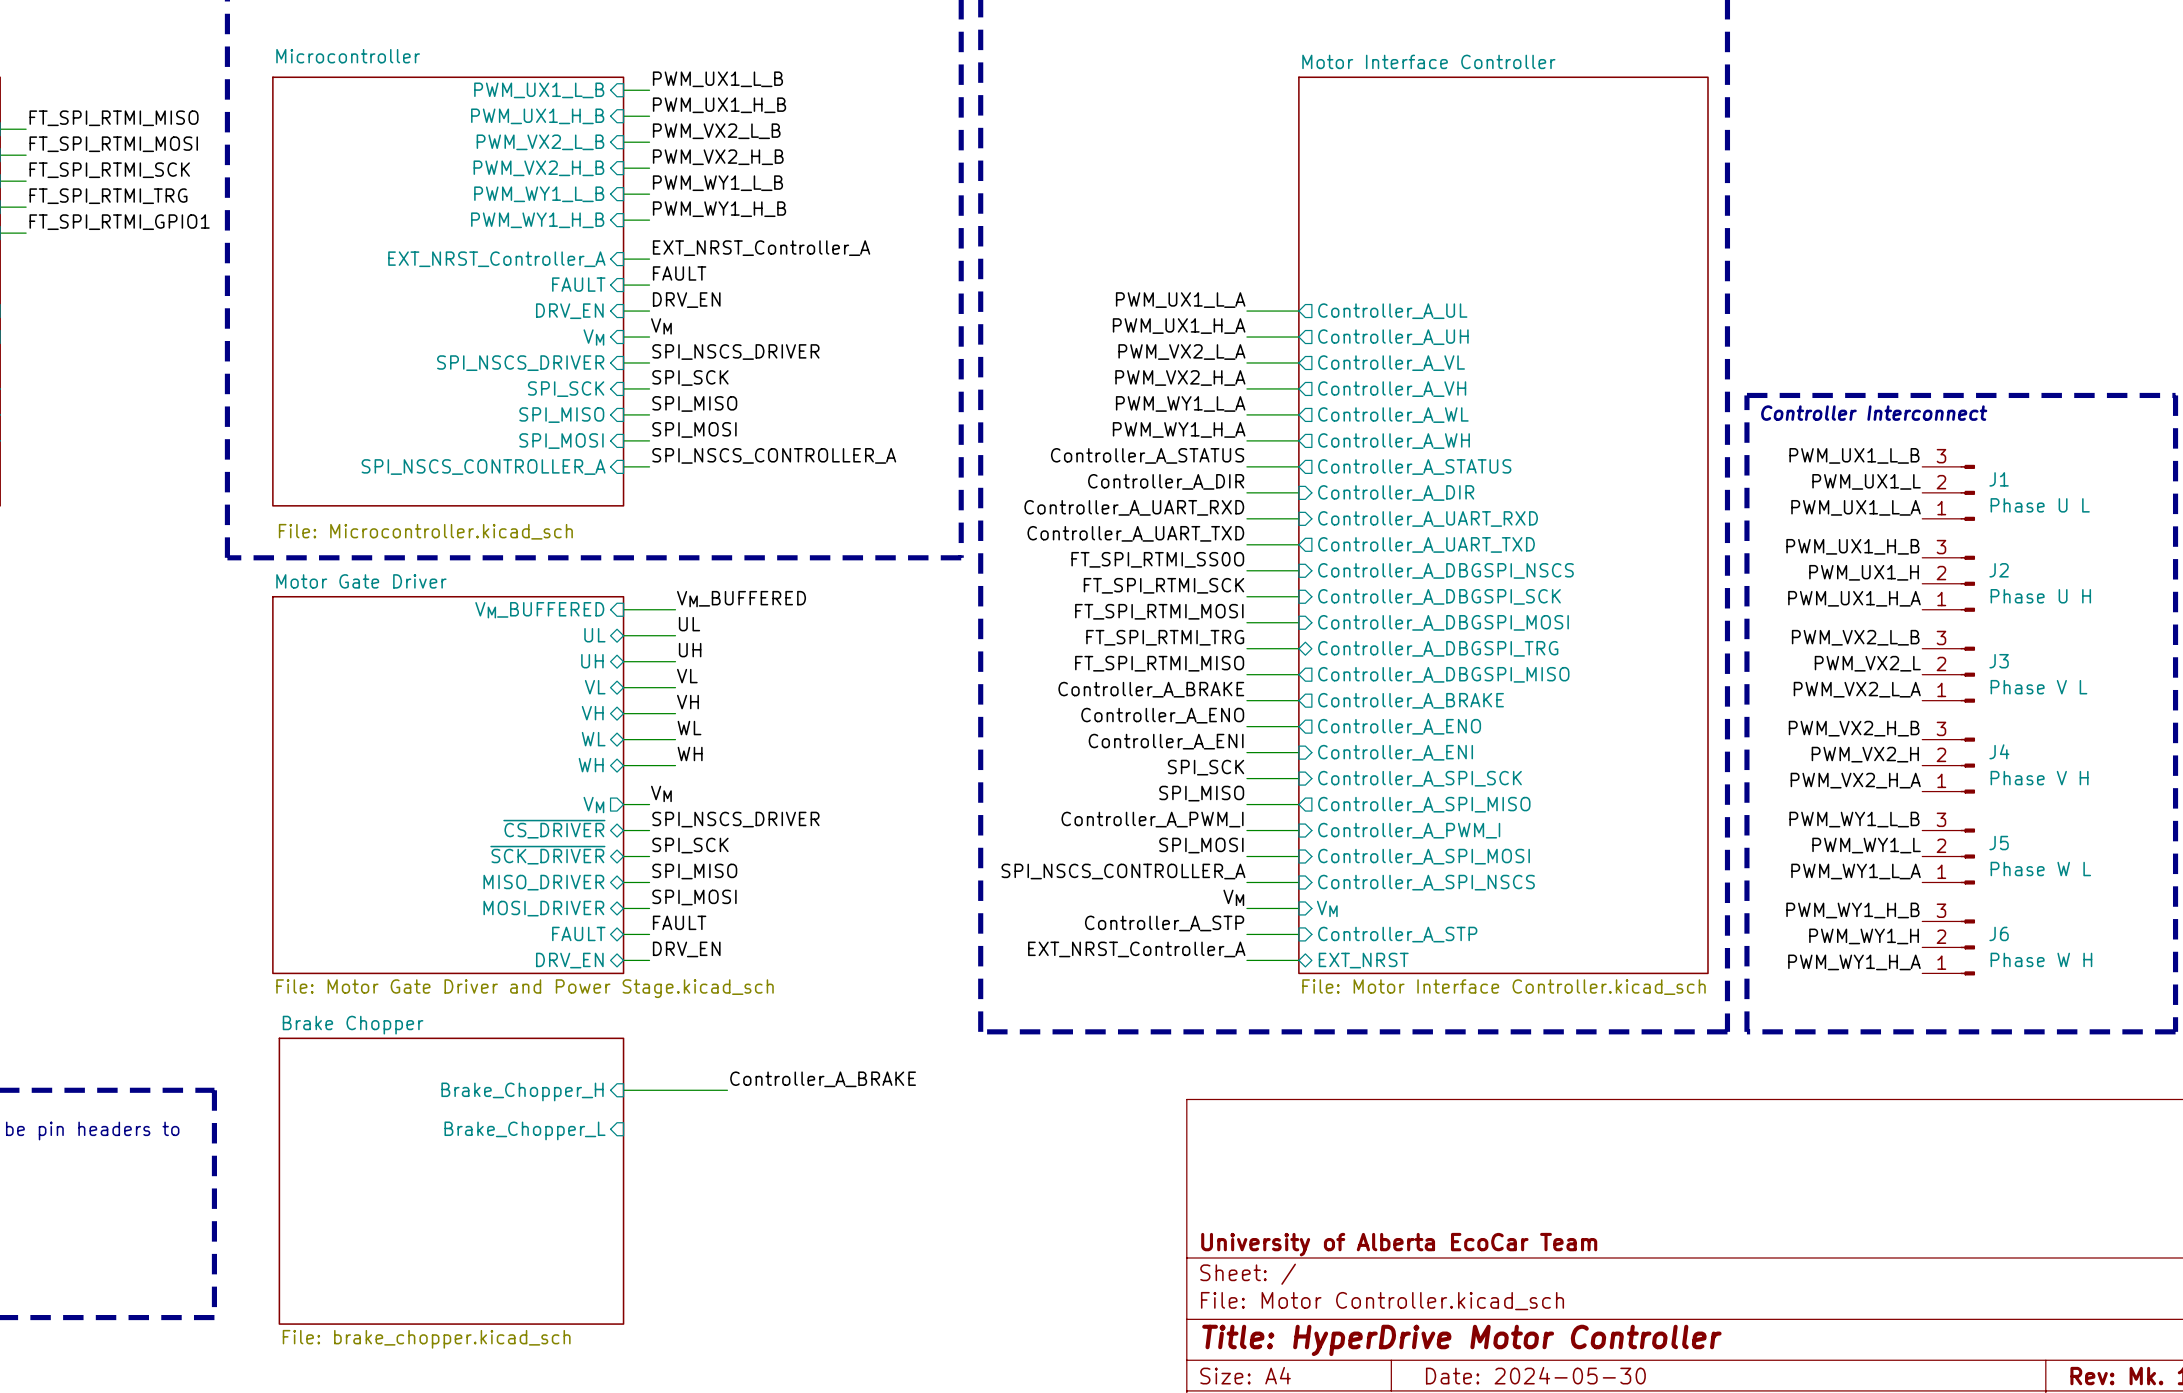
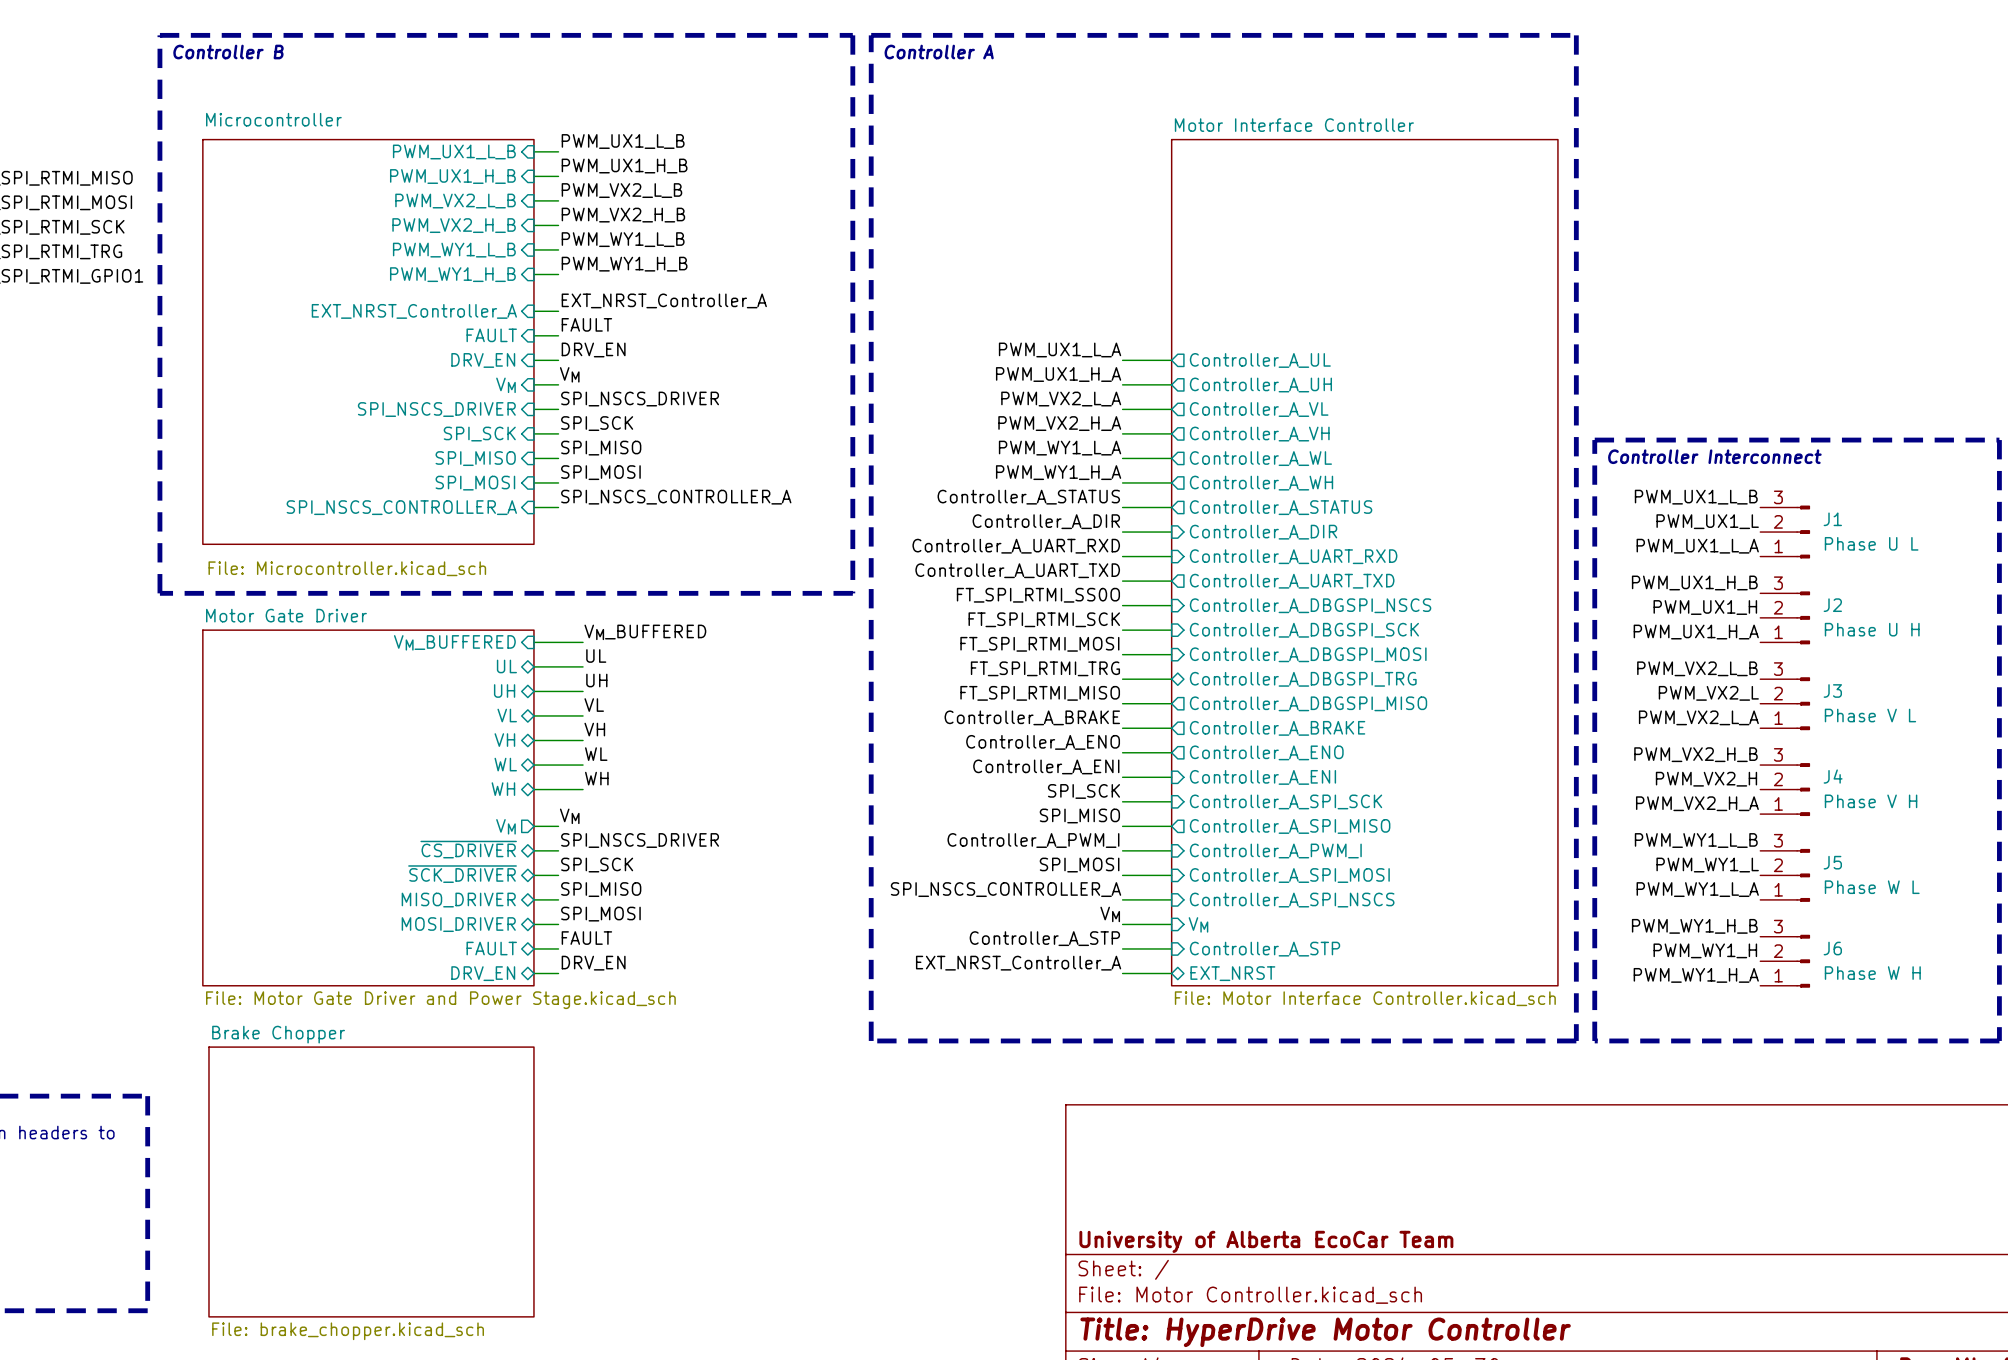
label: Controller_A_BRAKE (823, 1079) -> none
wire: (623, 1090) (727, 1090) -> none
sheet pin: Brake_Chopper_H (522, 1091) -> none
sheet pin: Brake_Chopper_L (525, 1130) -> none

